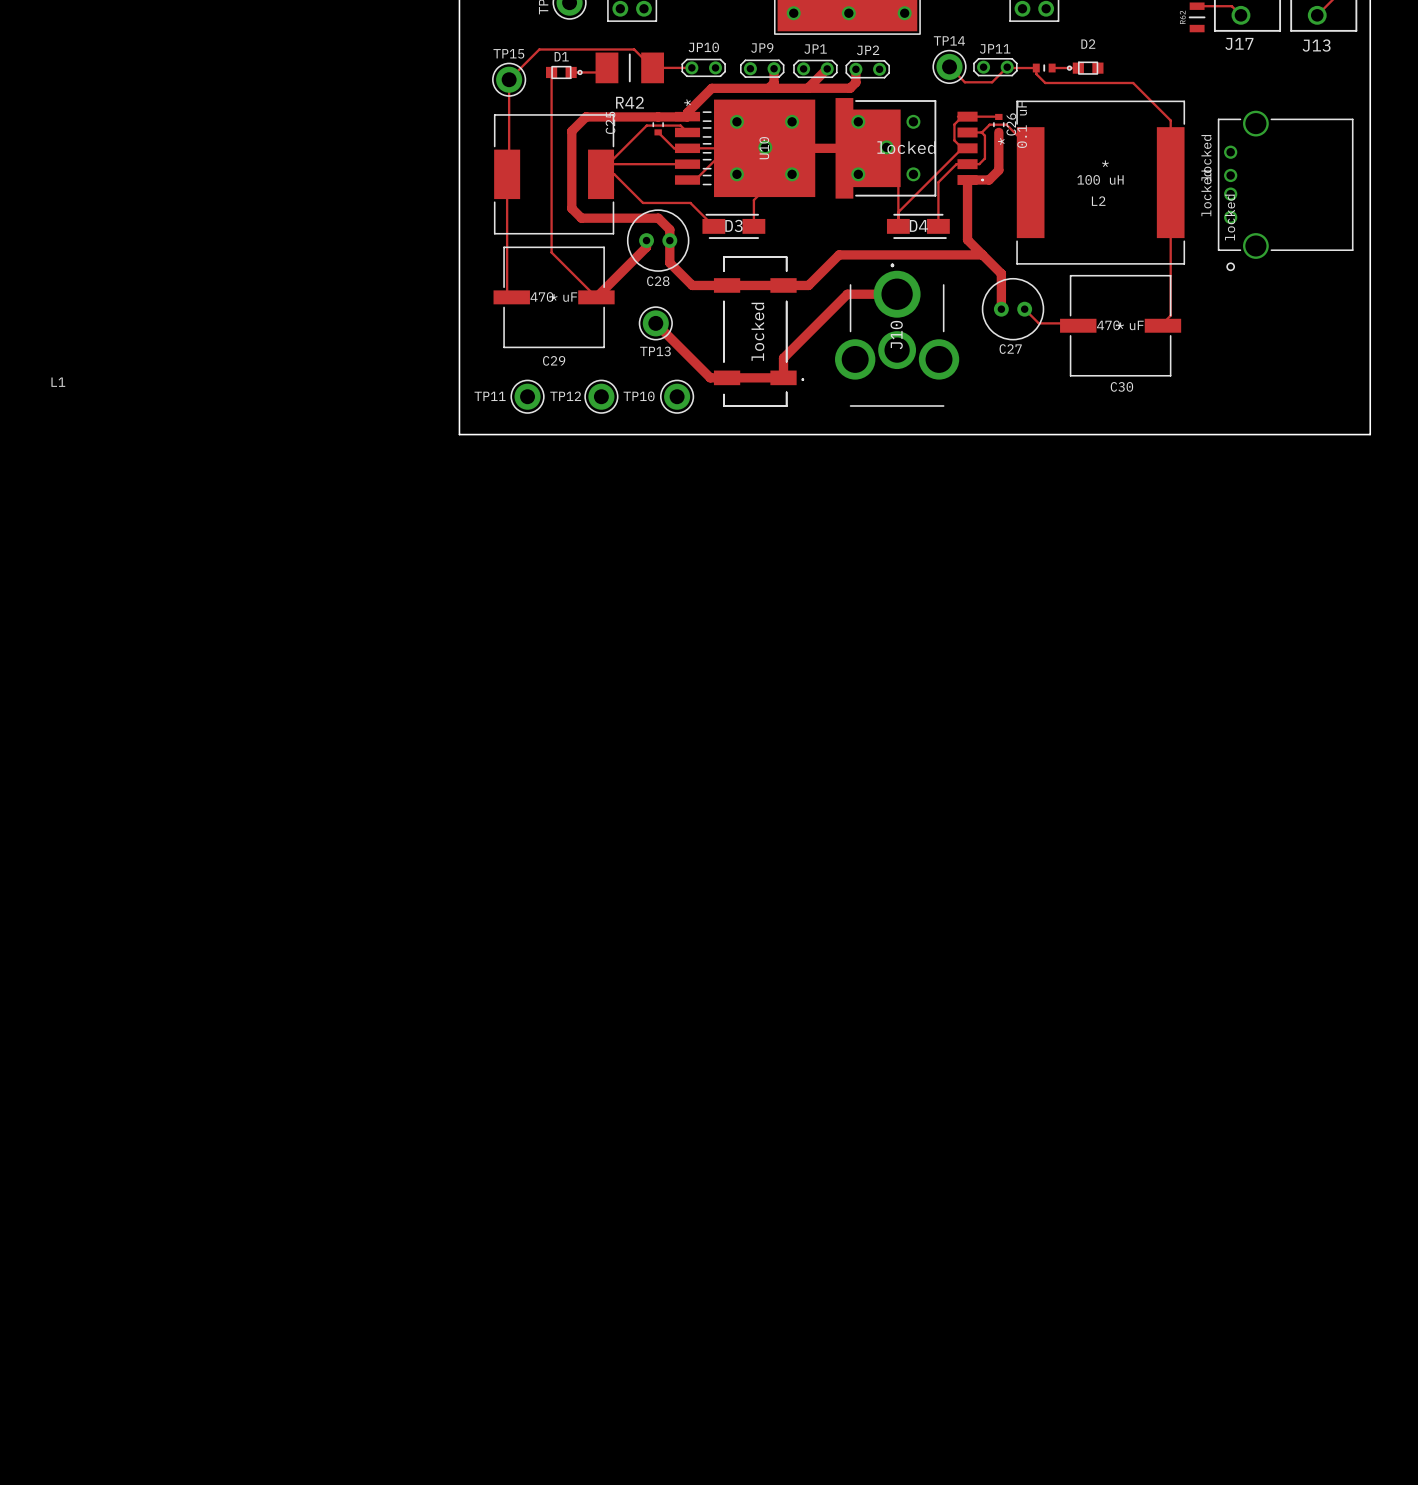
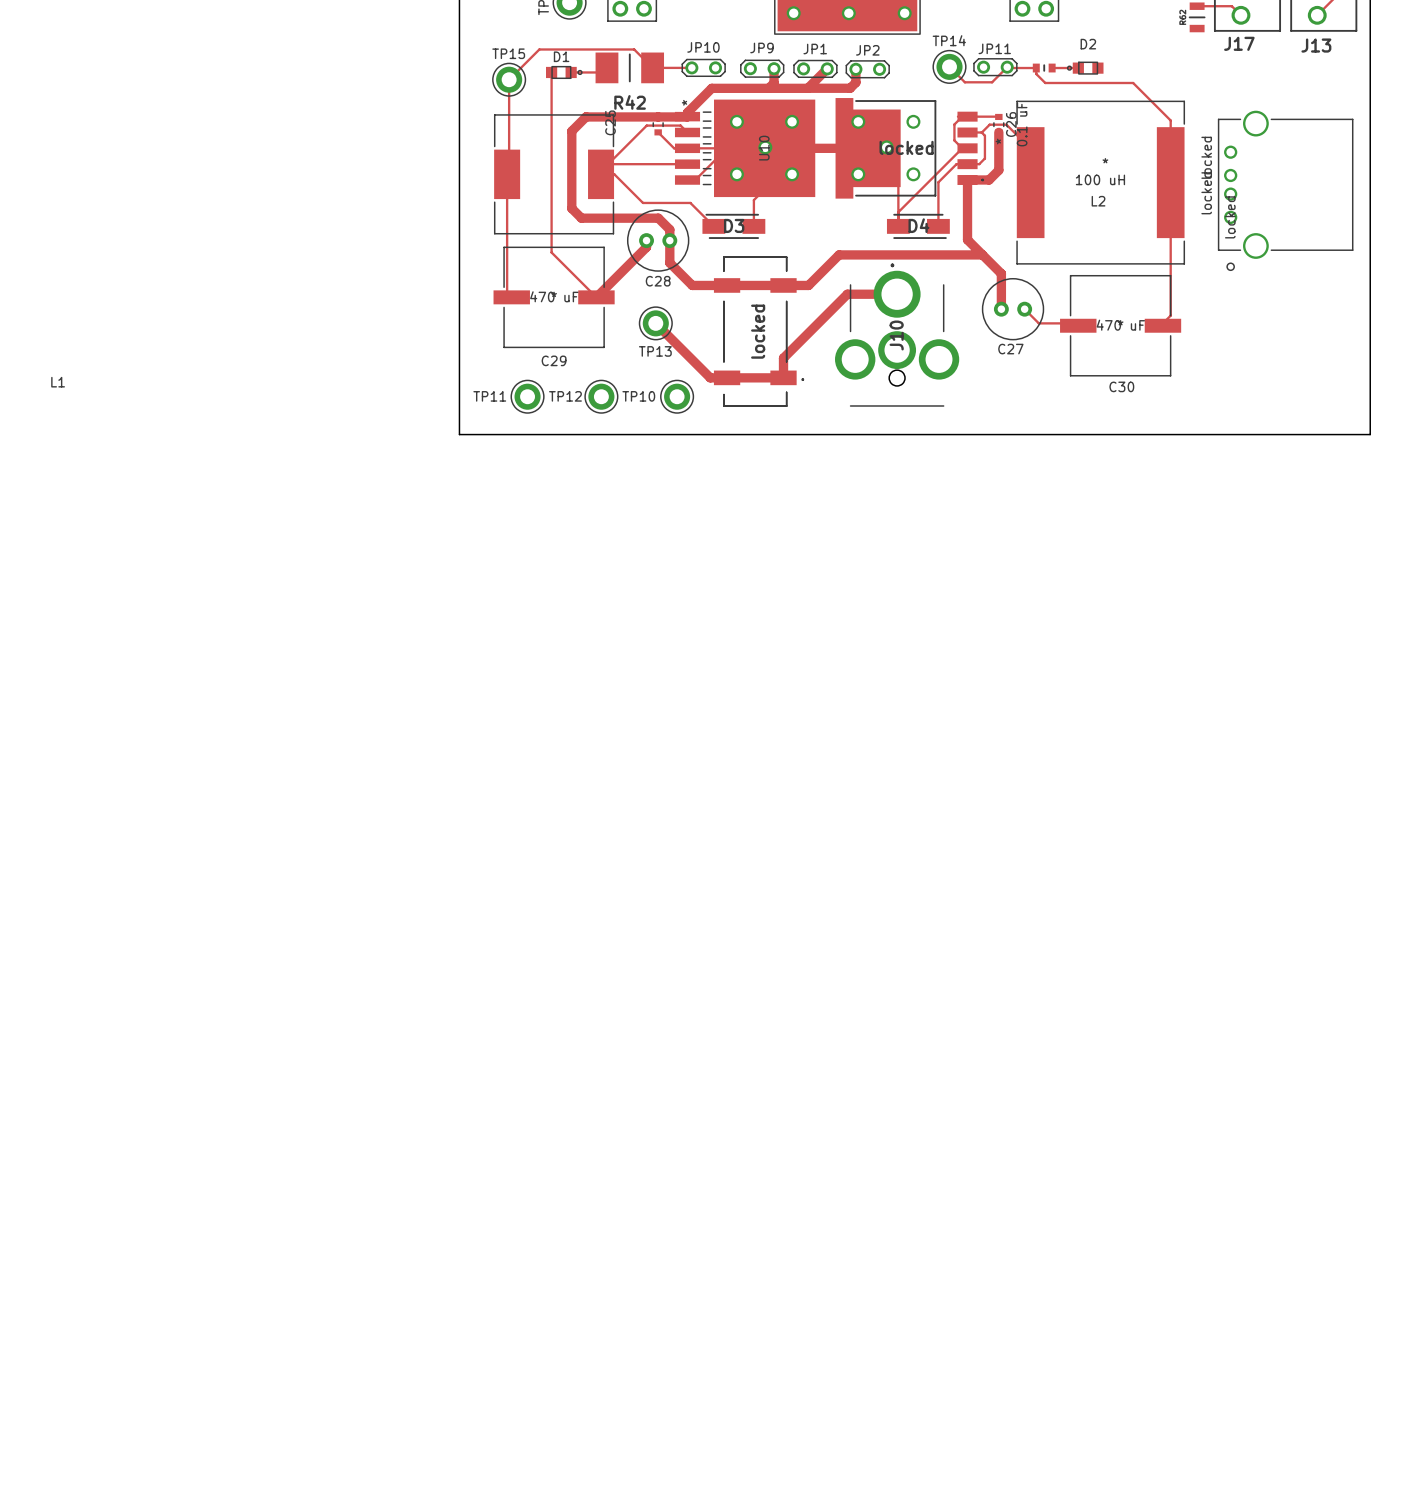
J10 footprint: [835, 263, 960, 407] -> [835, 263, 960, 407]

